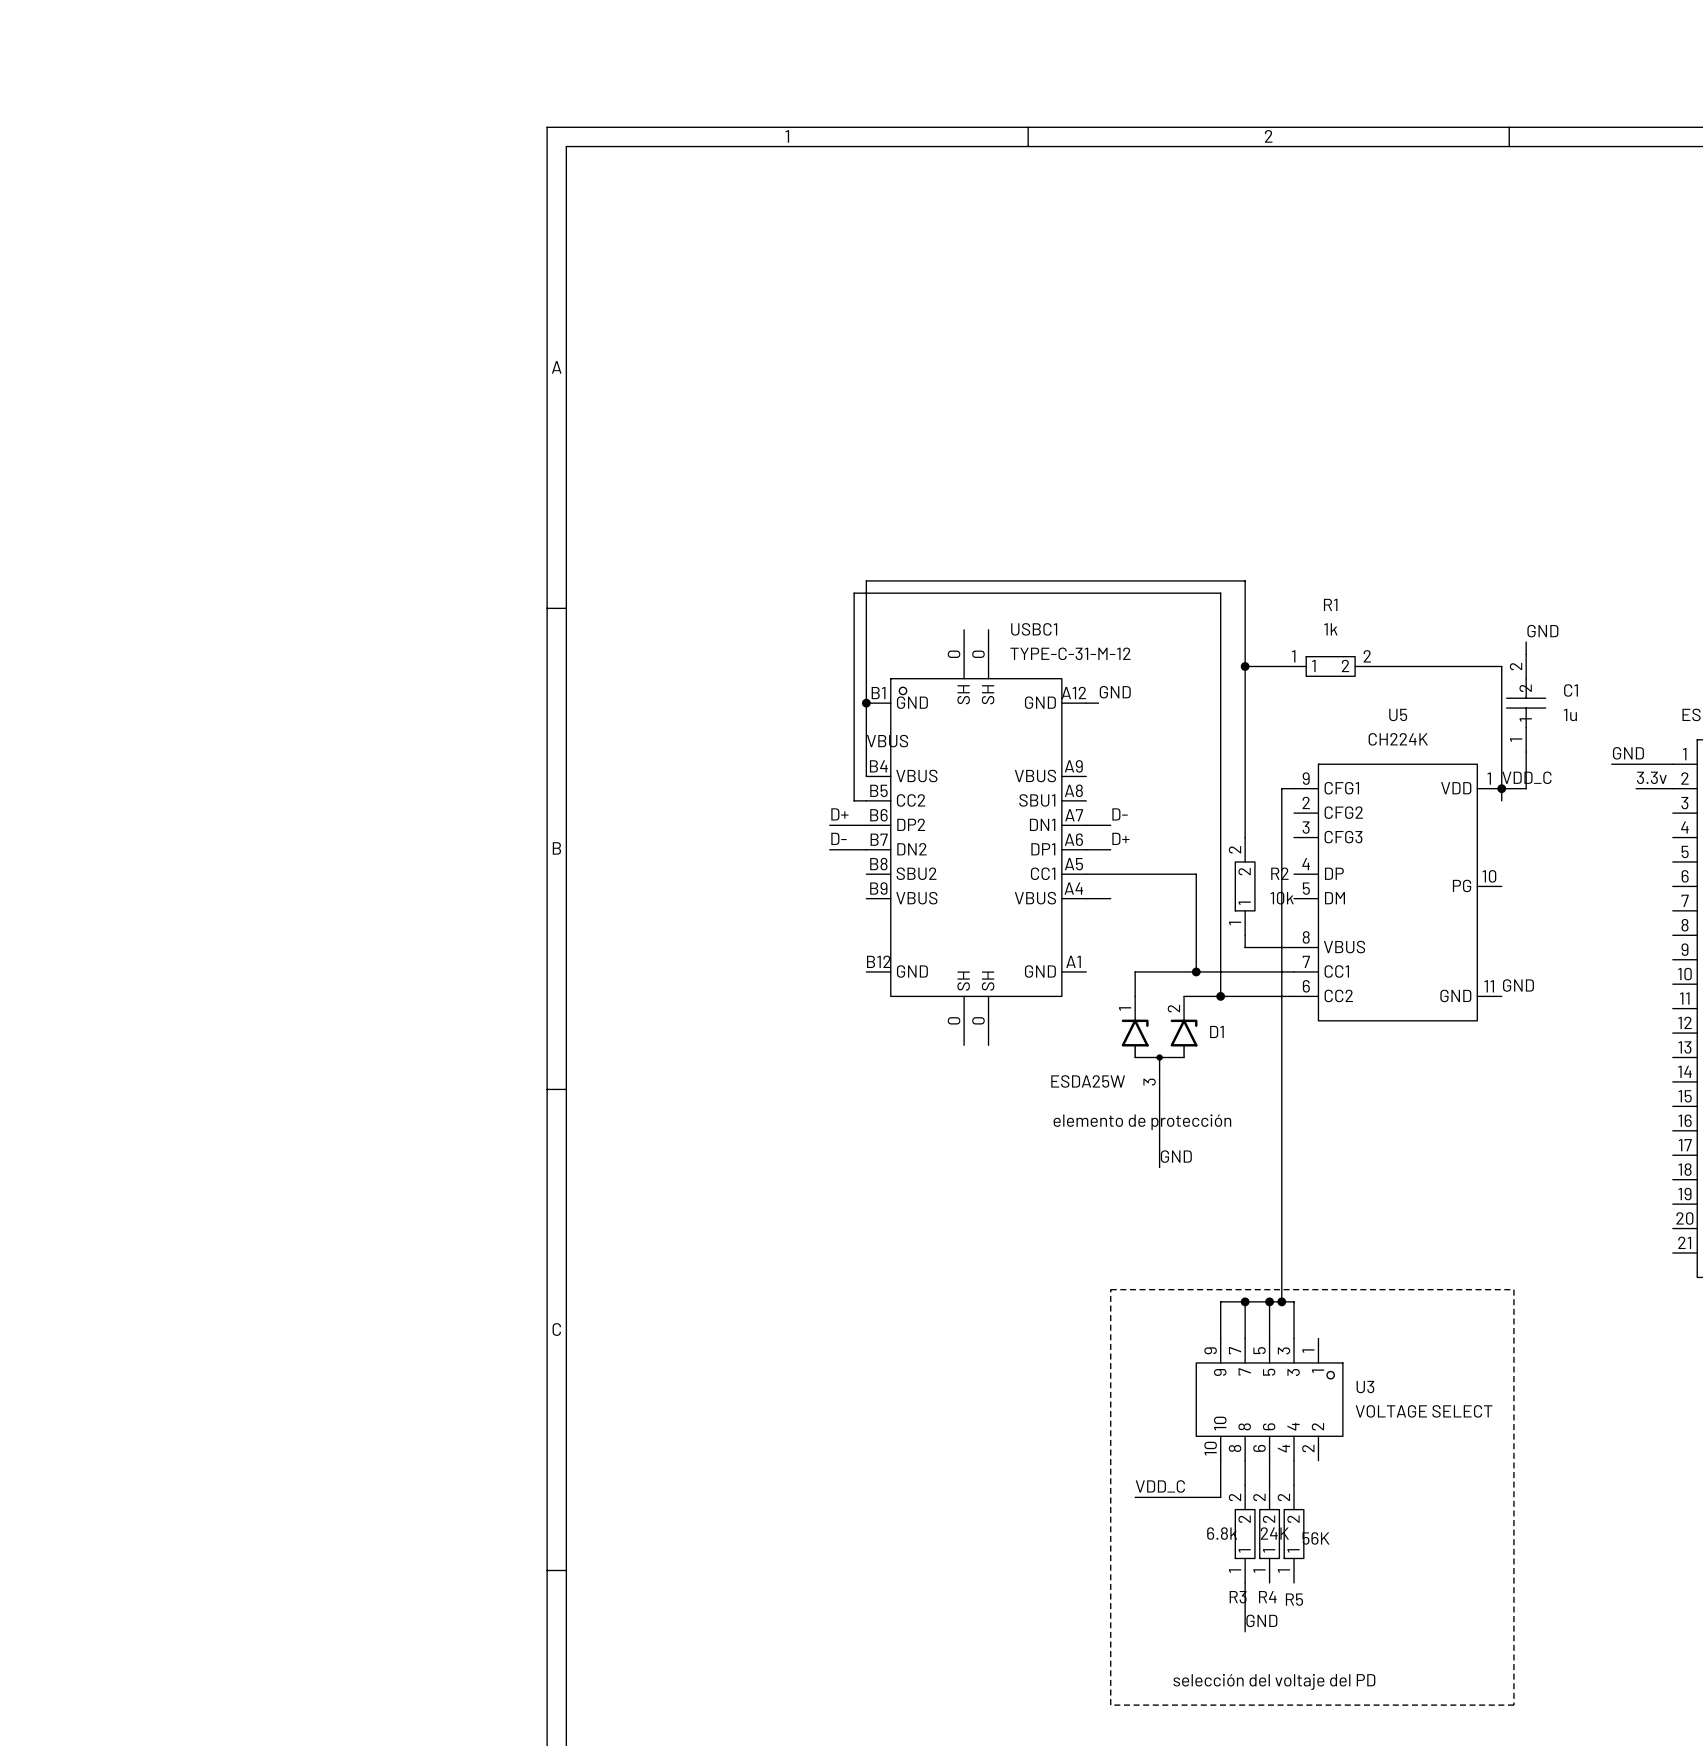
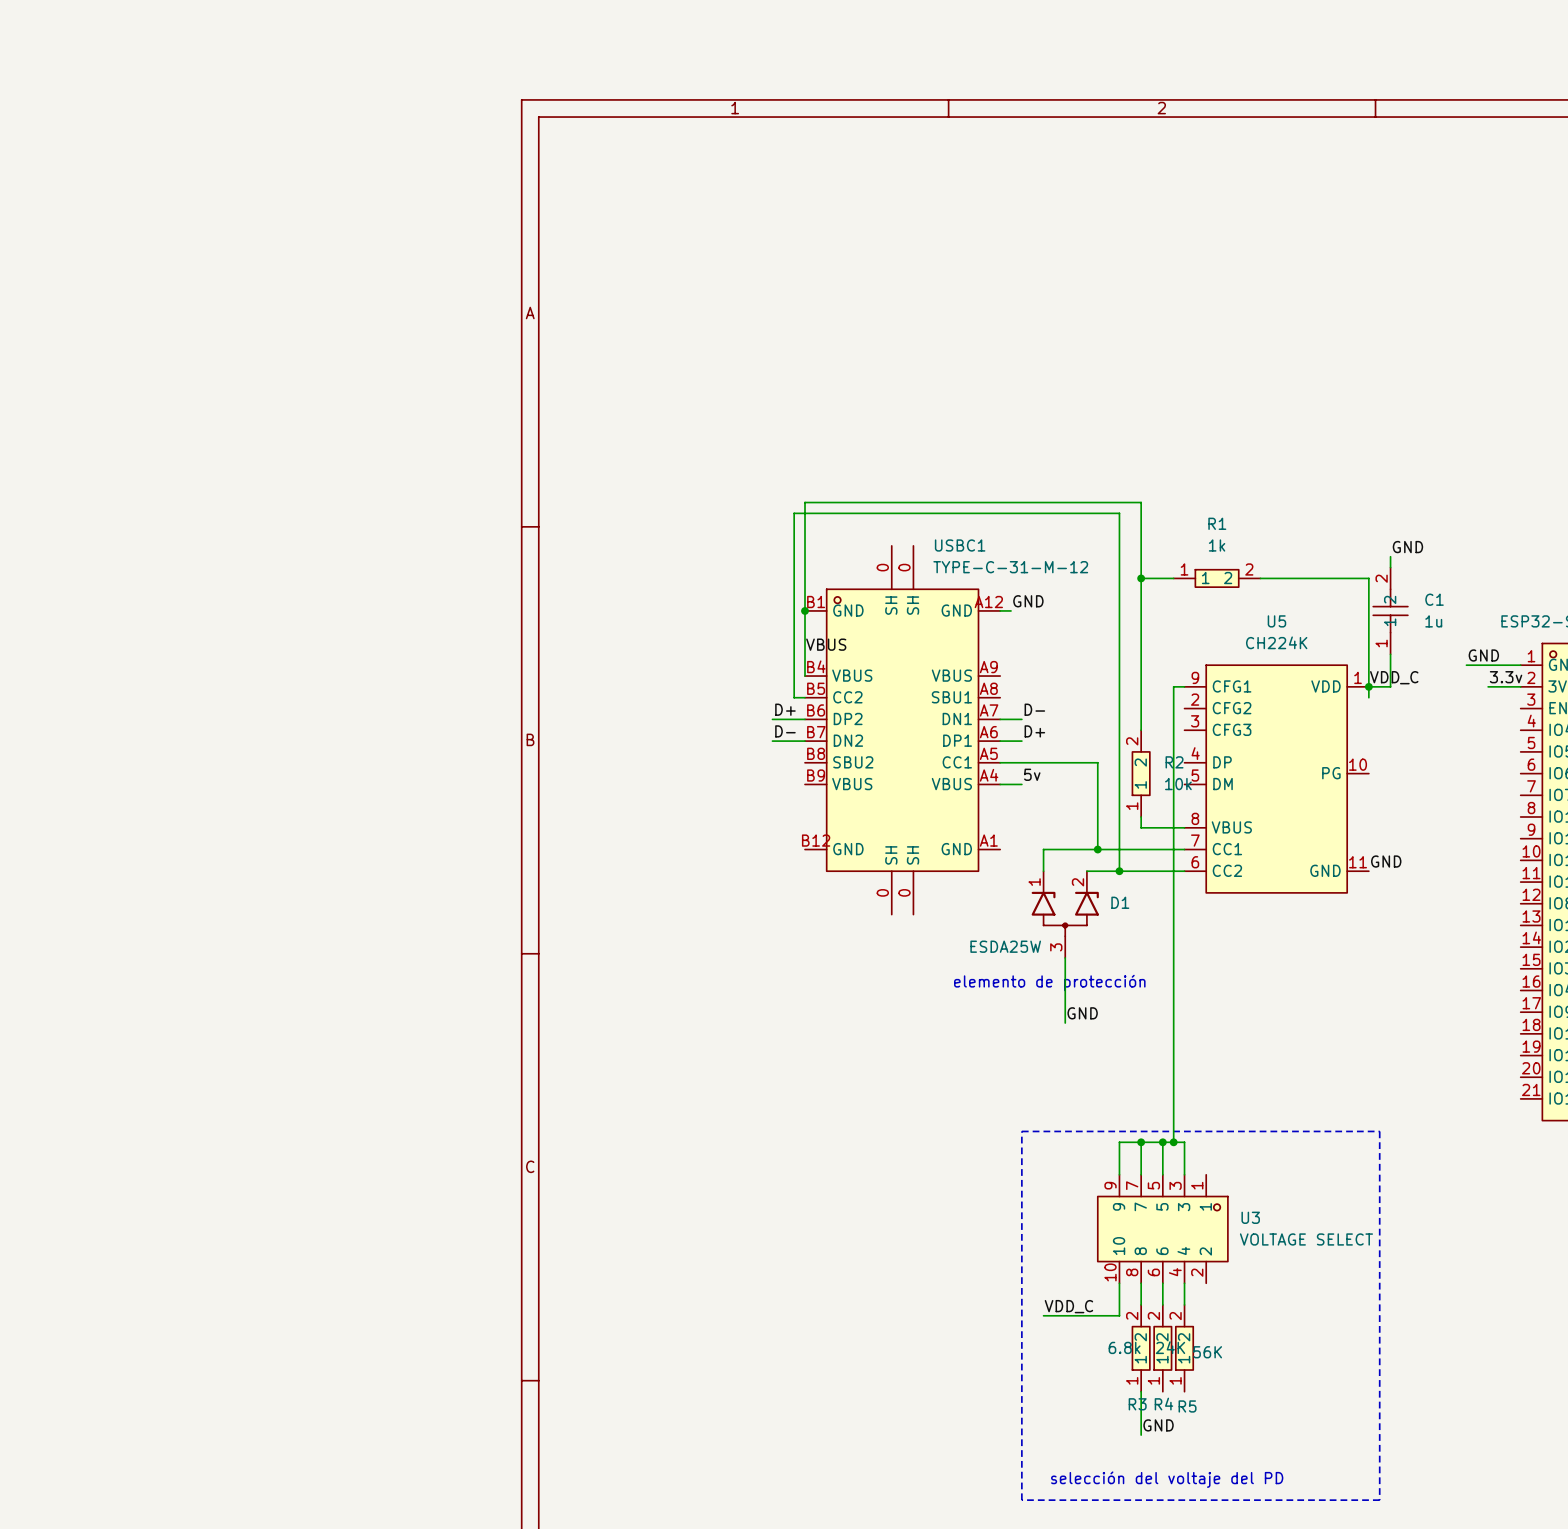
label: none -> 5v (1032, 774)

